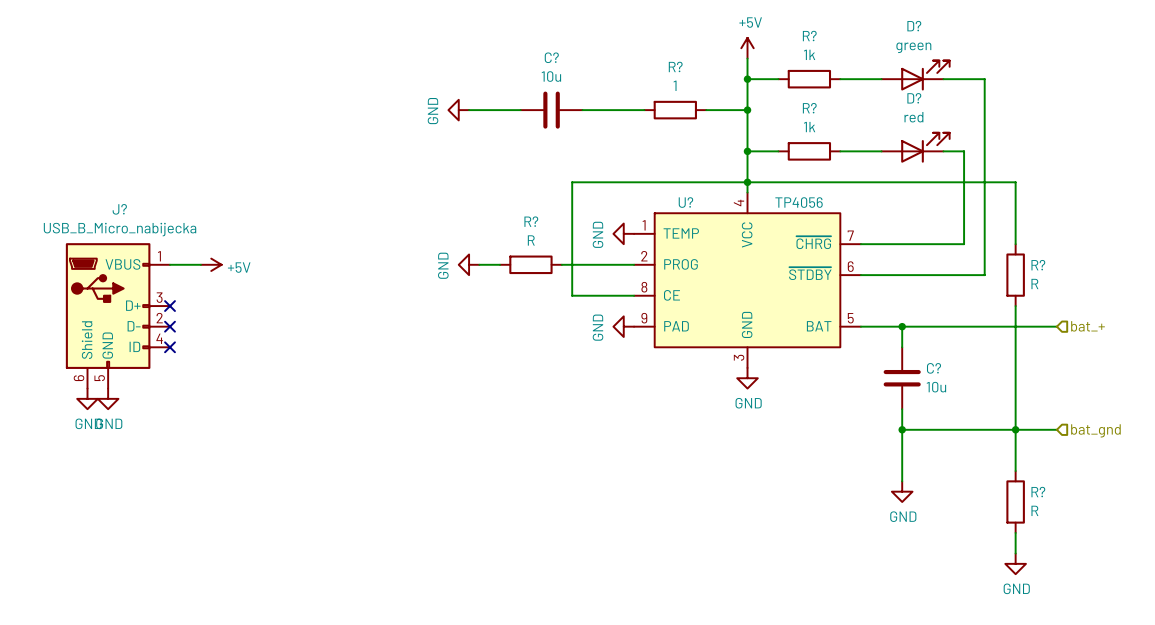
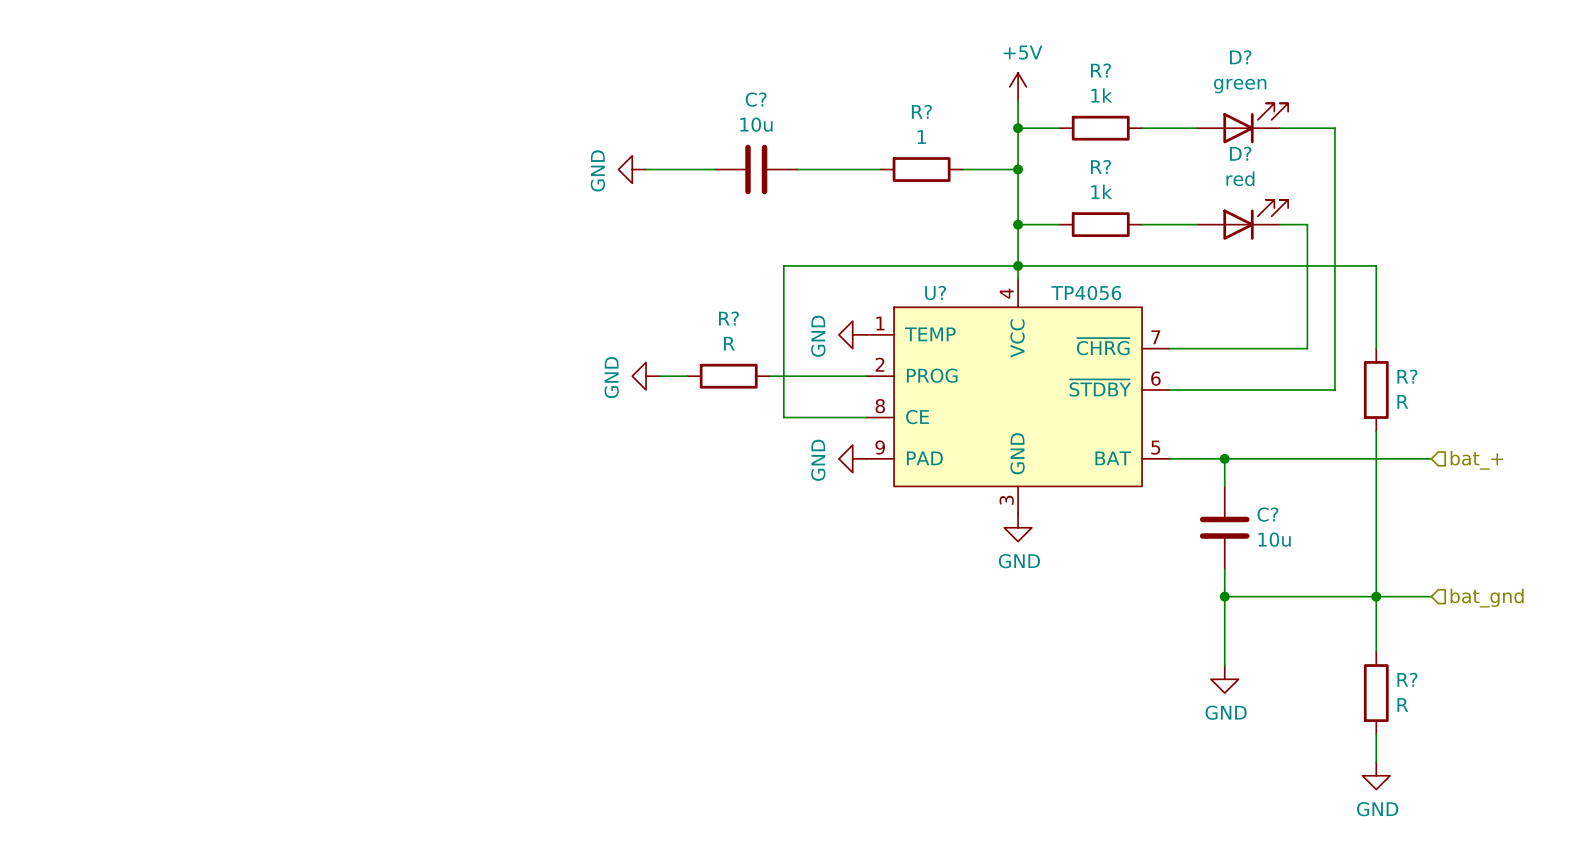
wire: (170, 264) (200, 264) -> none
power symbol: +5V (211, 264) -> none
no-connect mark: (170, 306) -> none
J?: USB_B_Micro_nabijecka (117, 315) -> none
no-connect mark: (170, 326) -> none
no-connect mark: (170, 347) -> none
power symbol: GND (87, 398) -> none
power symbol: GND (108, 398) -> none

